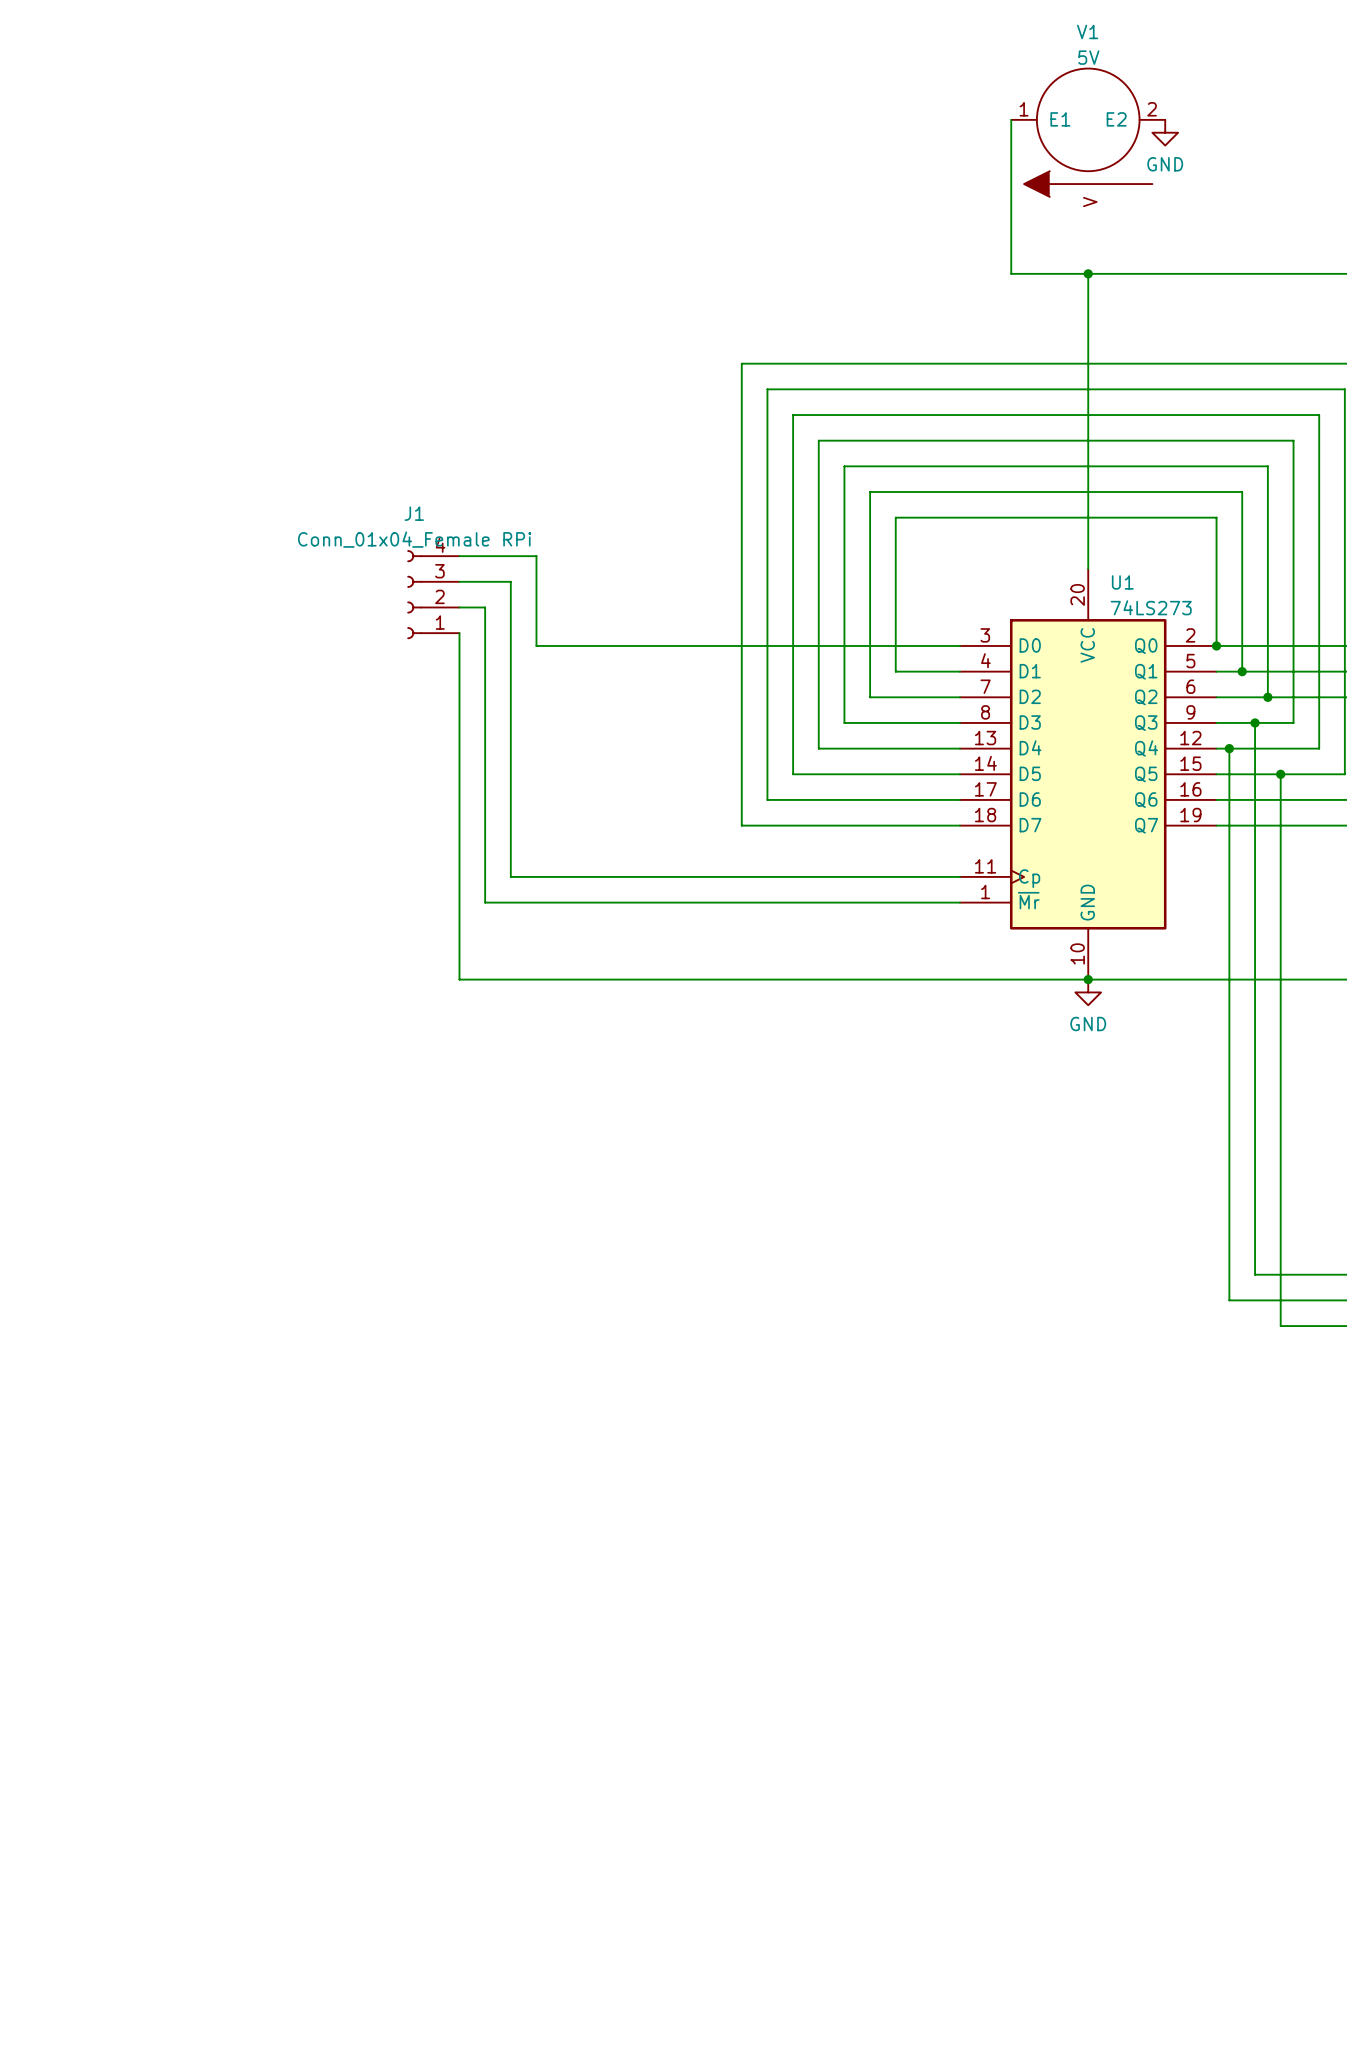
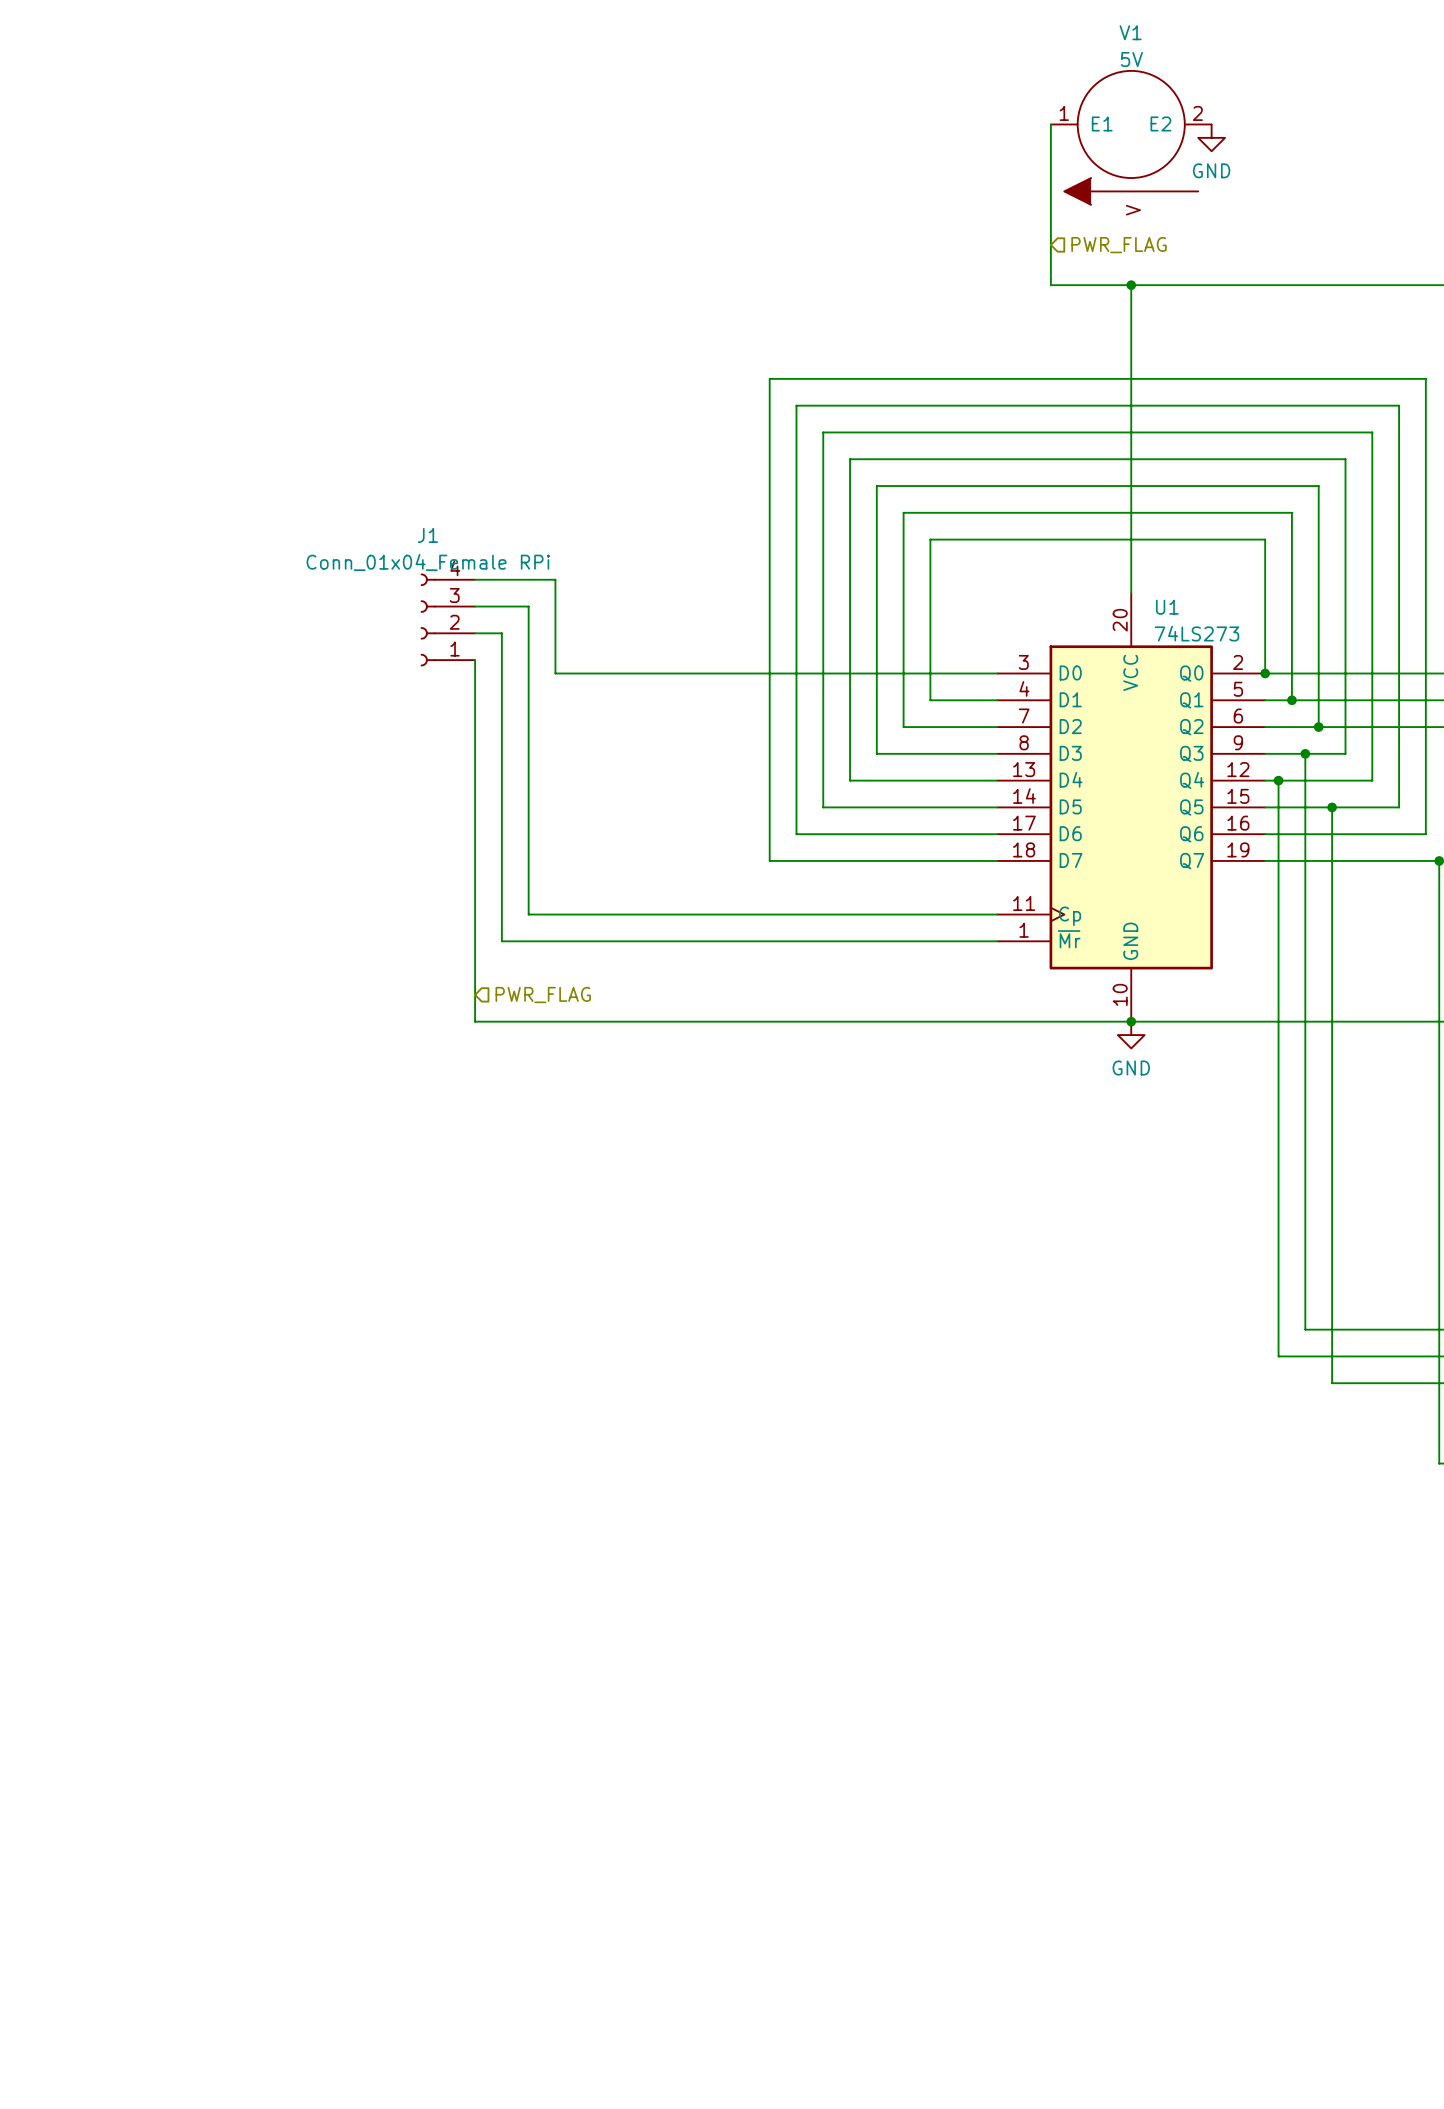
hierarchical label: none -> PWR_FLAG (1119, 245)
hierarchical label: none -> PWR_FLAG (543, 995)

